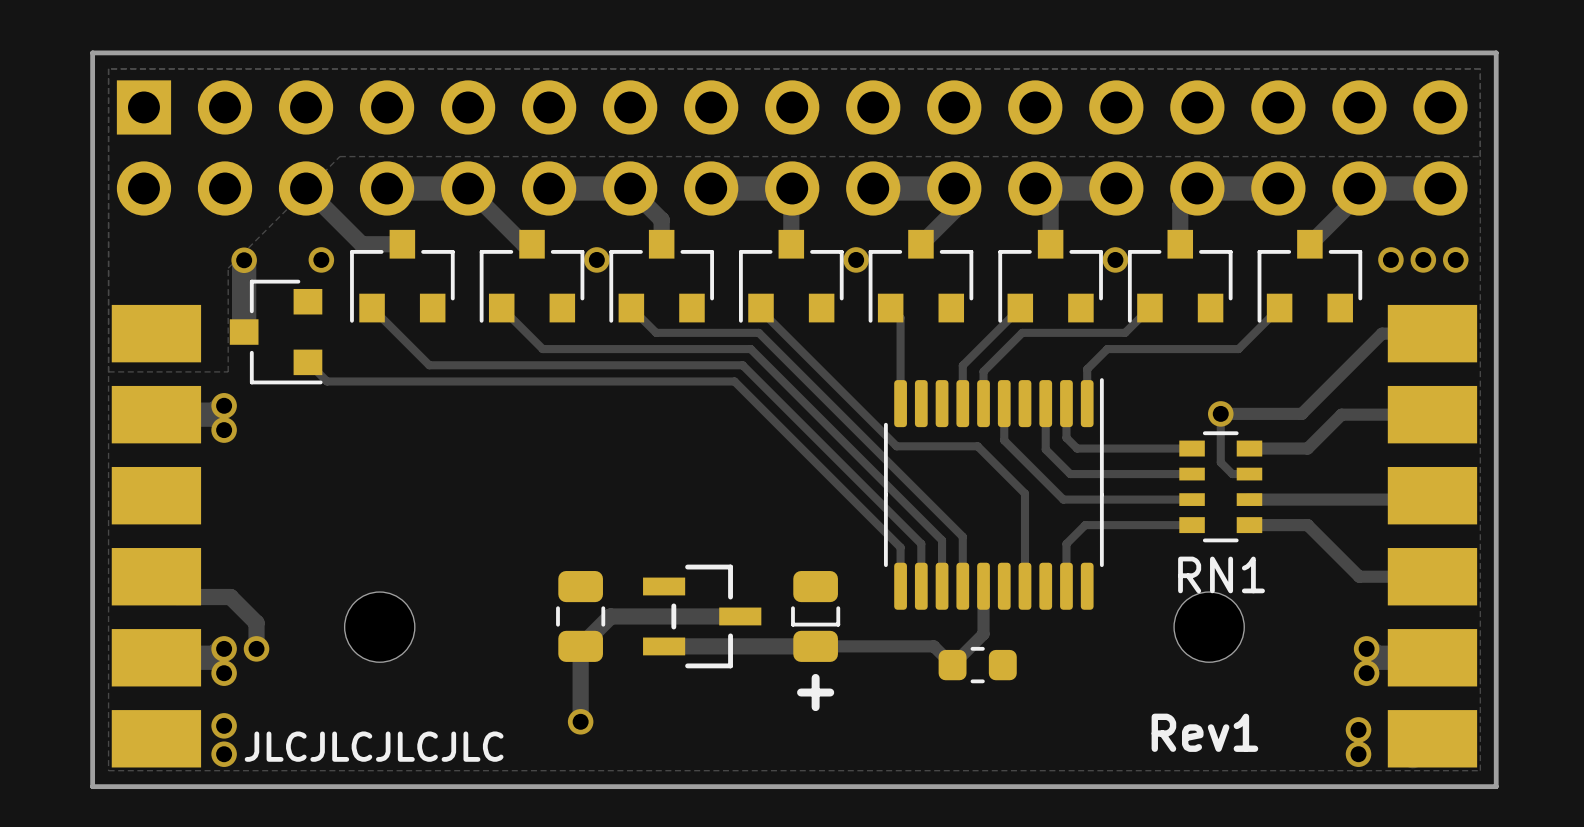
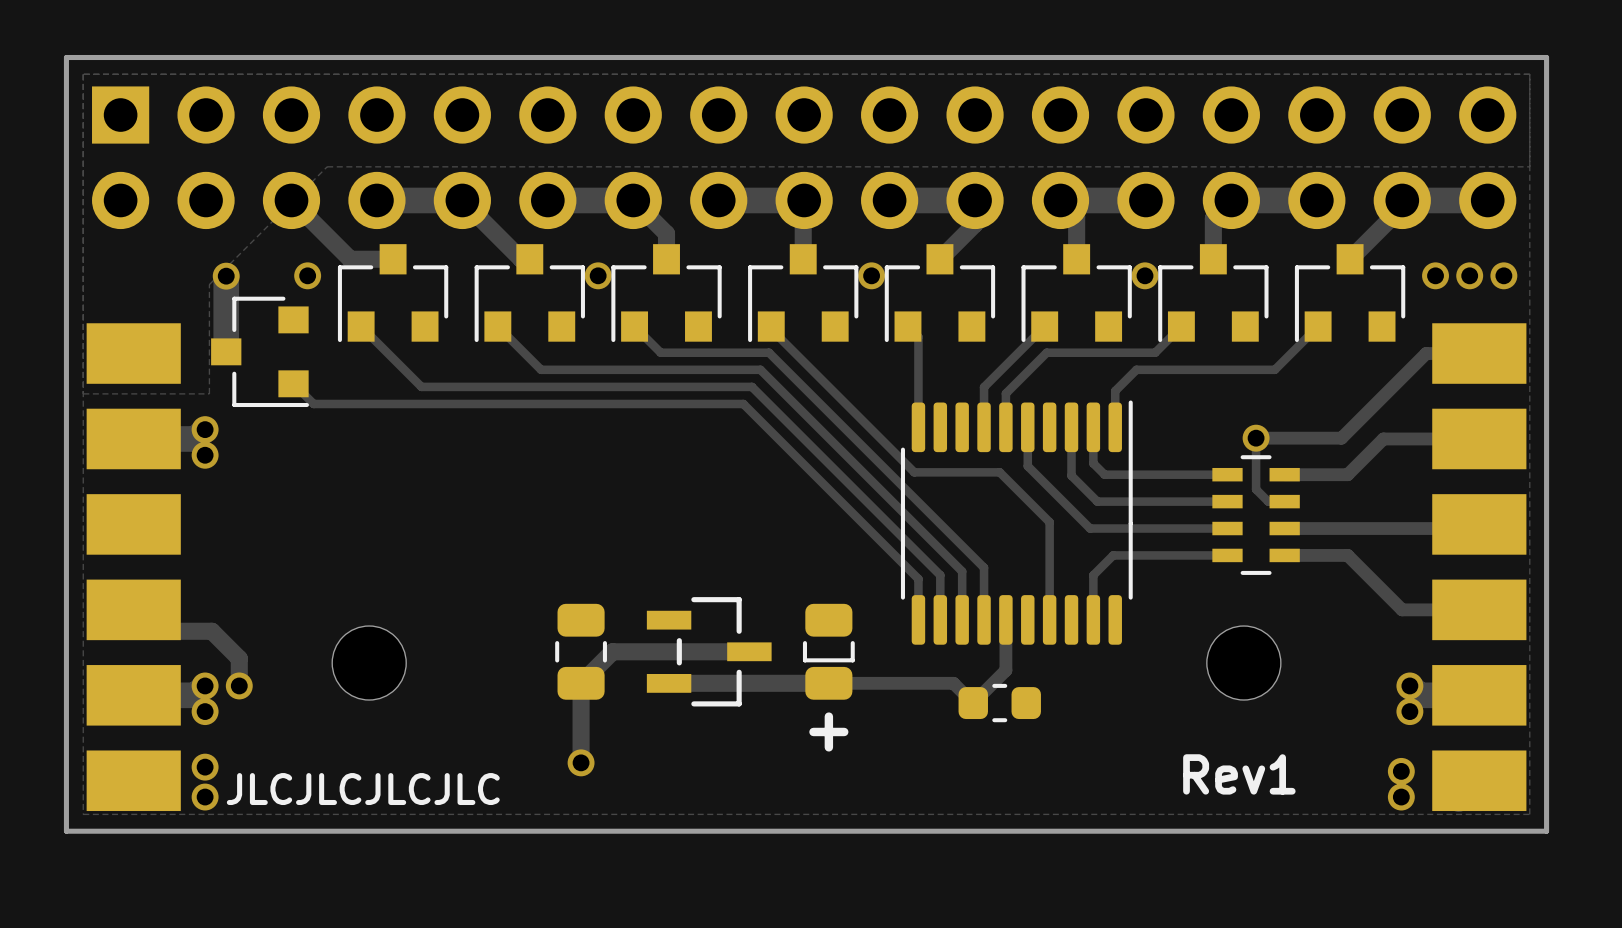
RN1: (1220, 486) -> none
part: none -> (1256, 515)

